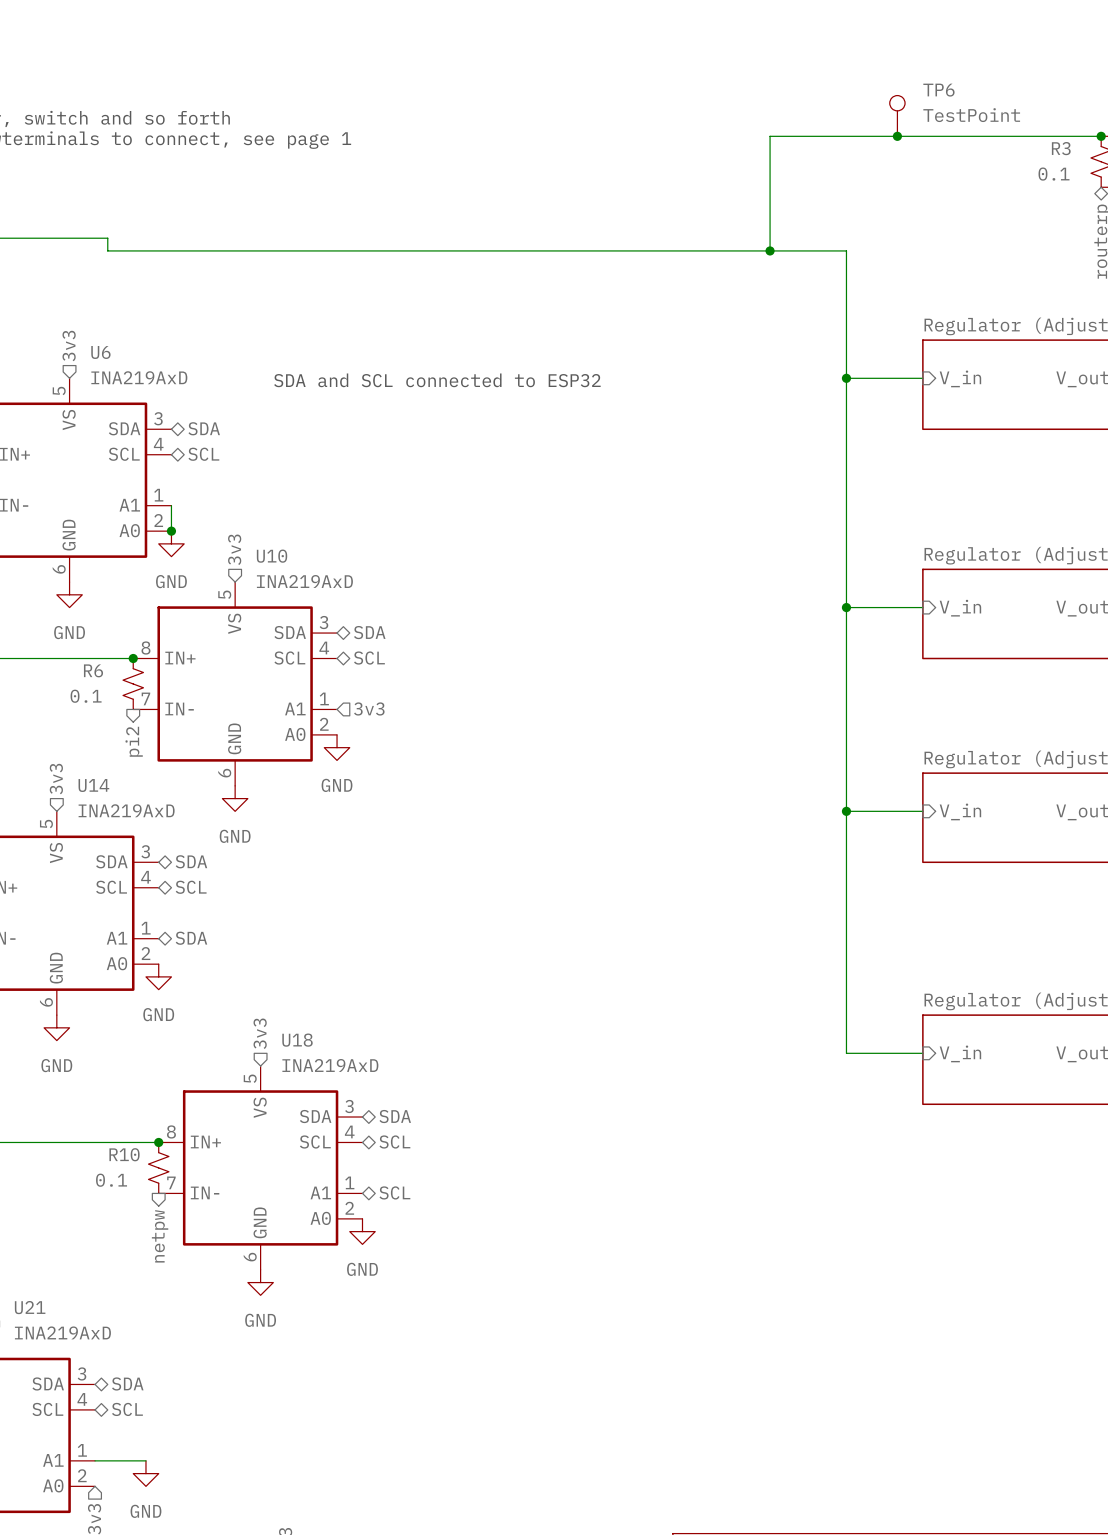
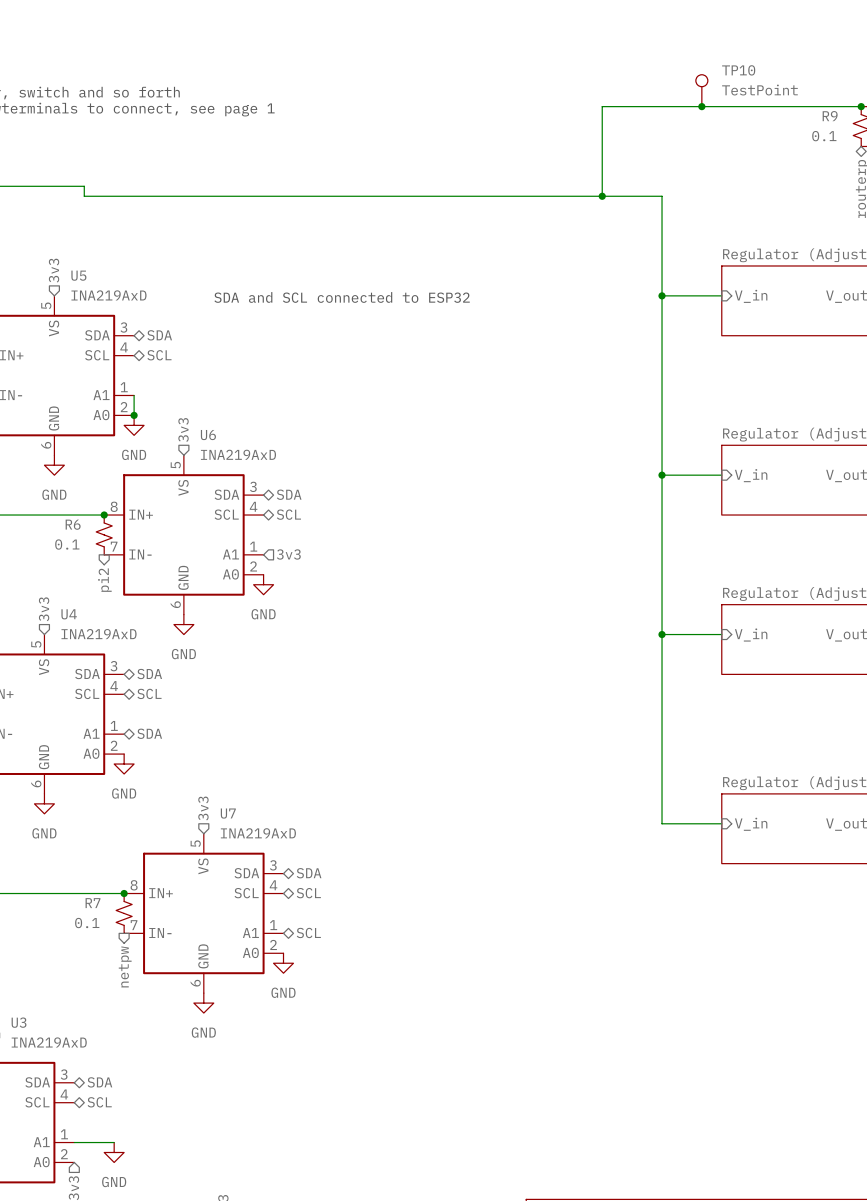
TP6 name: TP6 (938, 90) -> TP10 (738, 70)
R3 name: R3 (1061, 148) -> R9 (830, 116)
U6 name: U6 (100, 352) -> U5 (78, 275)
U10 name: U10 (272, 556) -> U6 (208, 435)
U14 name: U14 (93, 785) -> U4 (69, 614)
U18 name: U18 (297, 1040) -> U7 (228, 813)
R10 name: R10 (124, 1154) -> R7 (93, 903)
U21 name: U21 (30, 1307) -> U3 (19, 1022)

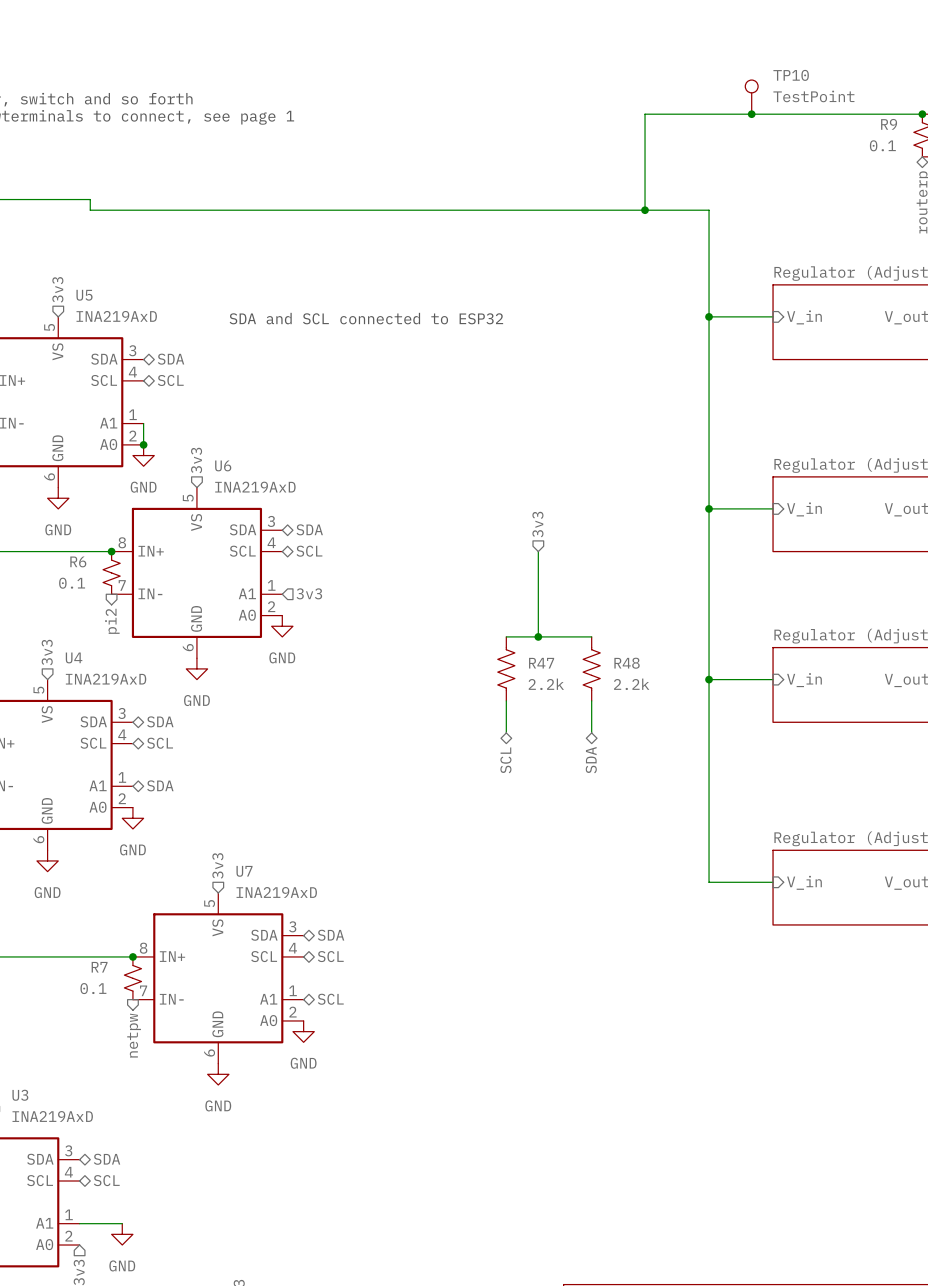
hierarchical label: none -> 3v3 (537, 524)
wire: none -> (538, 551) (538, 636)
wire: none -> (506, 636) (591, 636)
junction: none -> (538, 636)
R47: none -> 2.2k (506, 668)
R48: none -> 2.2k (591, 668)
wire: none -> (506, 700) (506, 732)
wire: none -> (591, 700) (591, 732)
hierarchical label: none -> SCL (505, 760)
hierarchical label: none -> SDA (591, 760)

